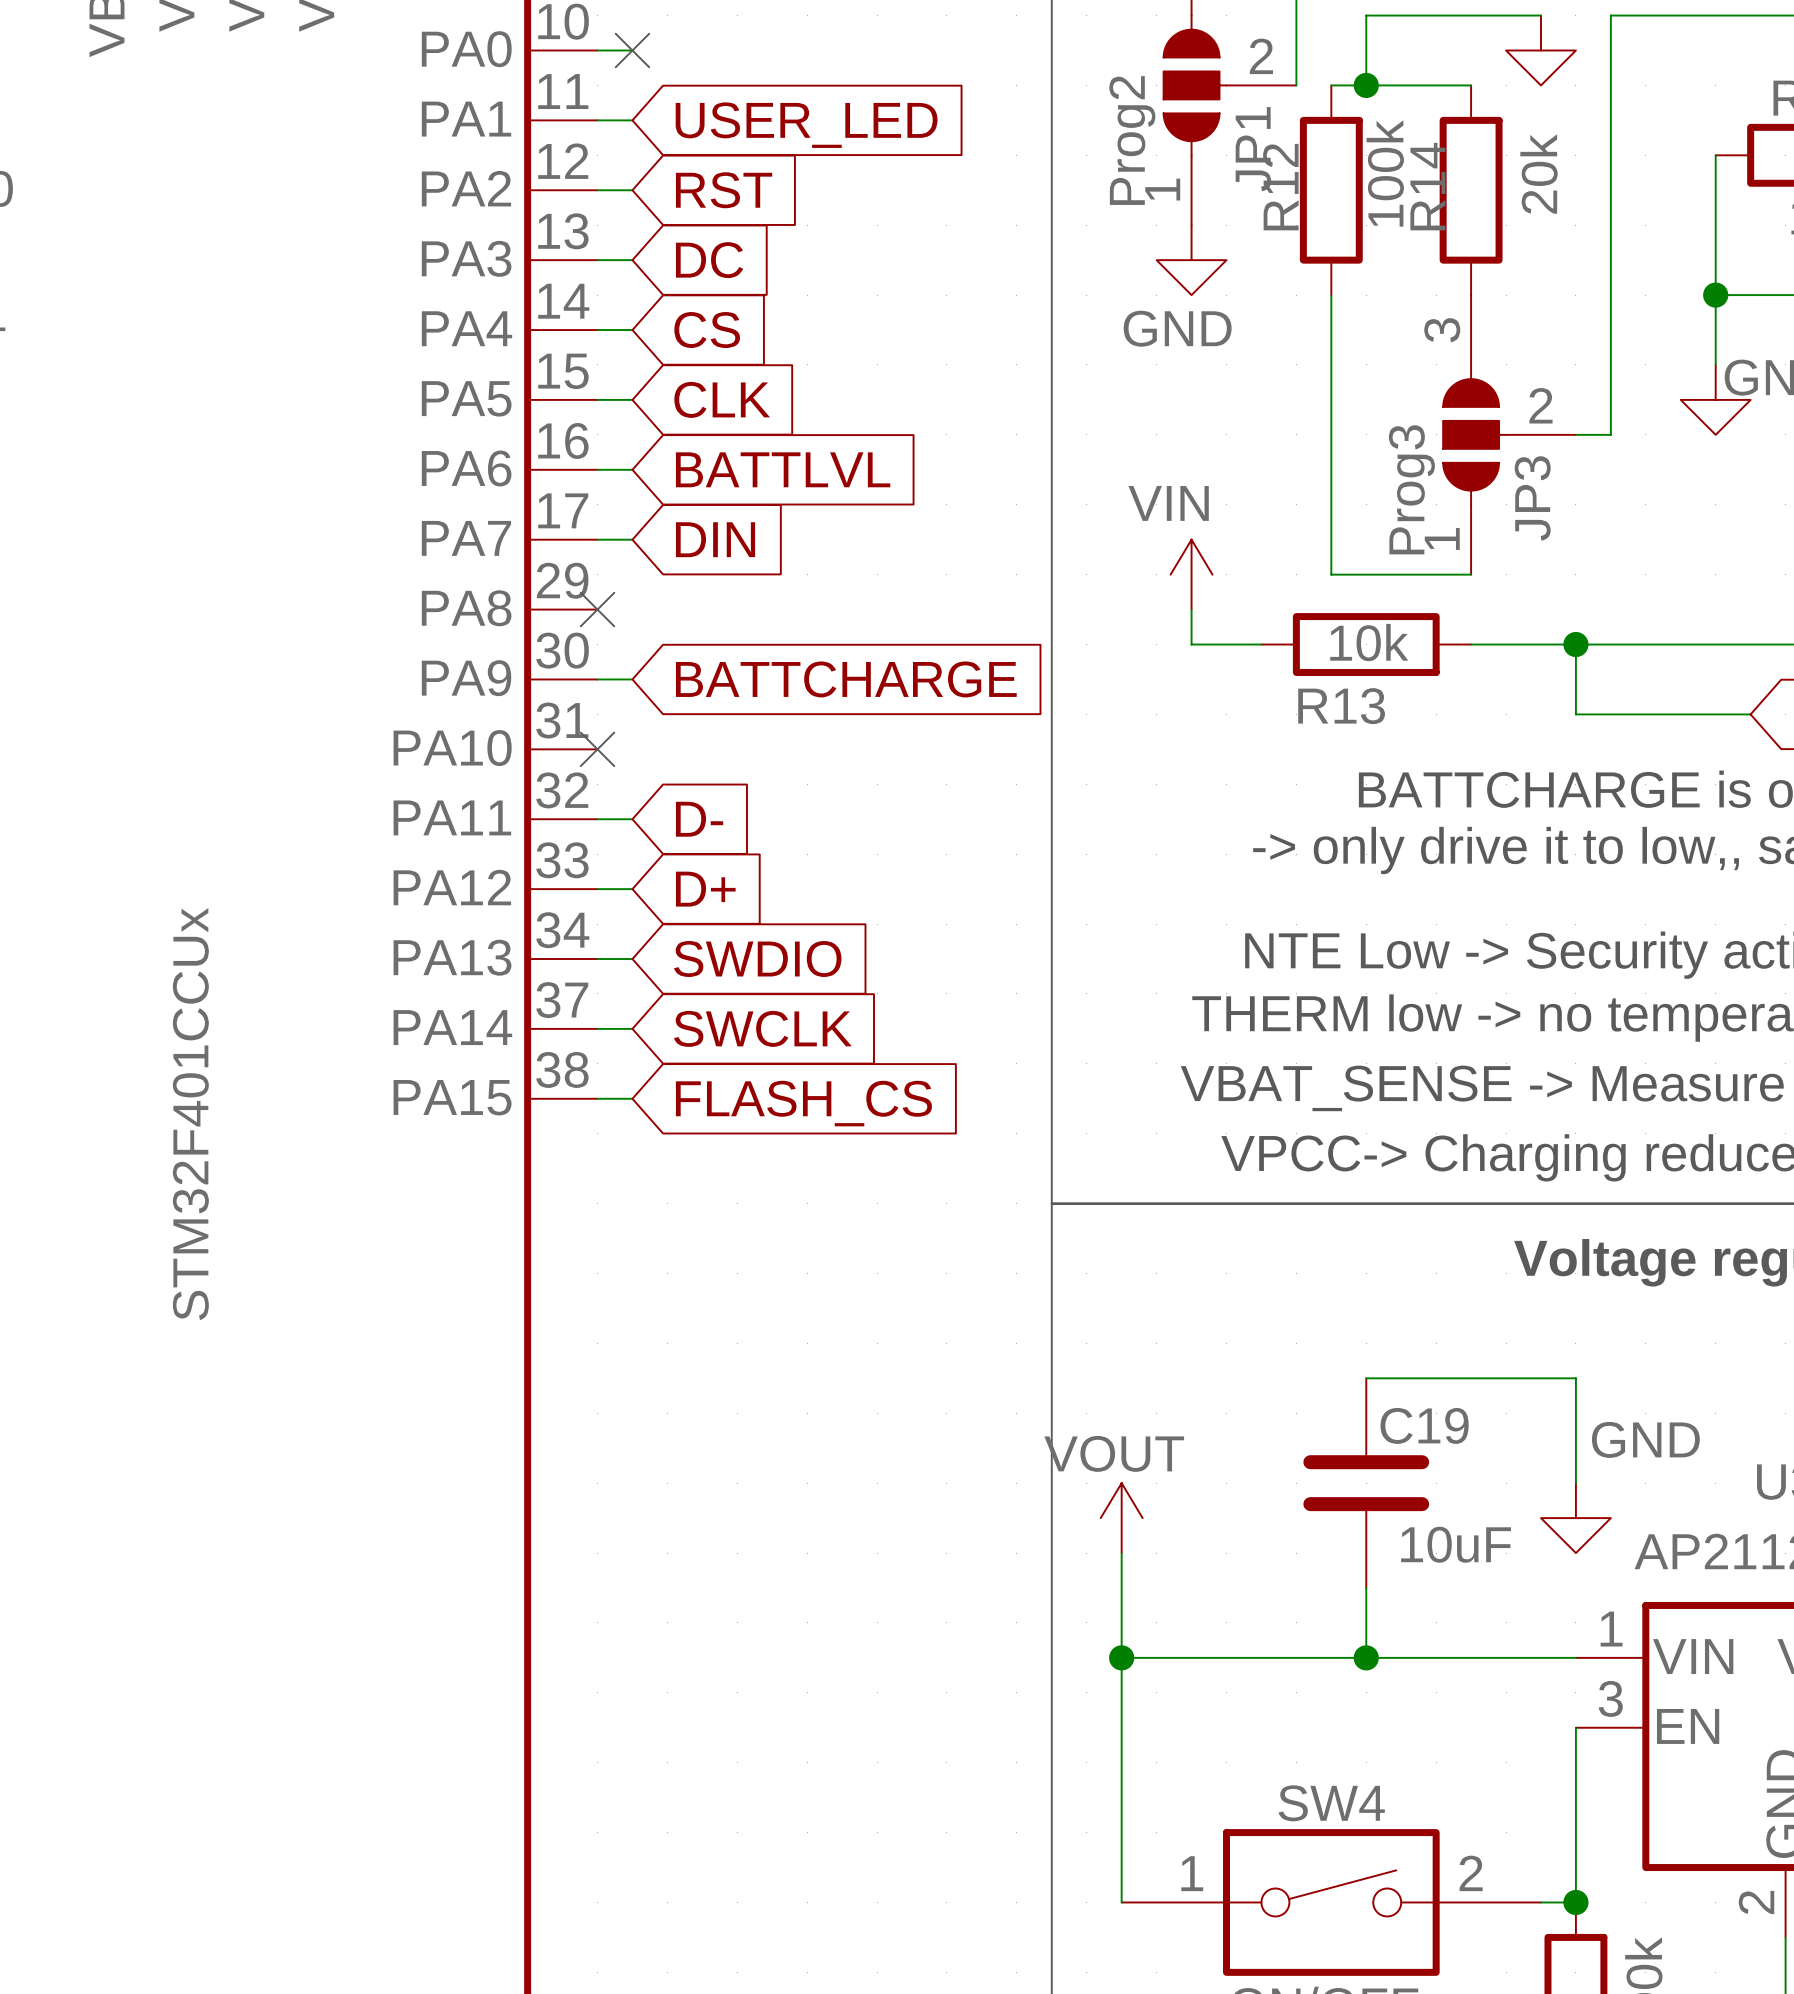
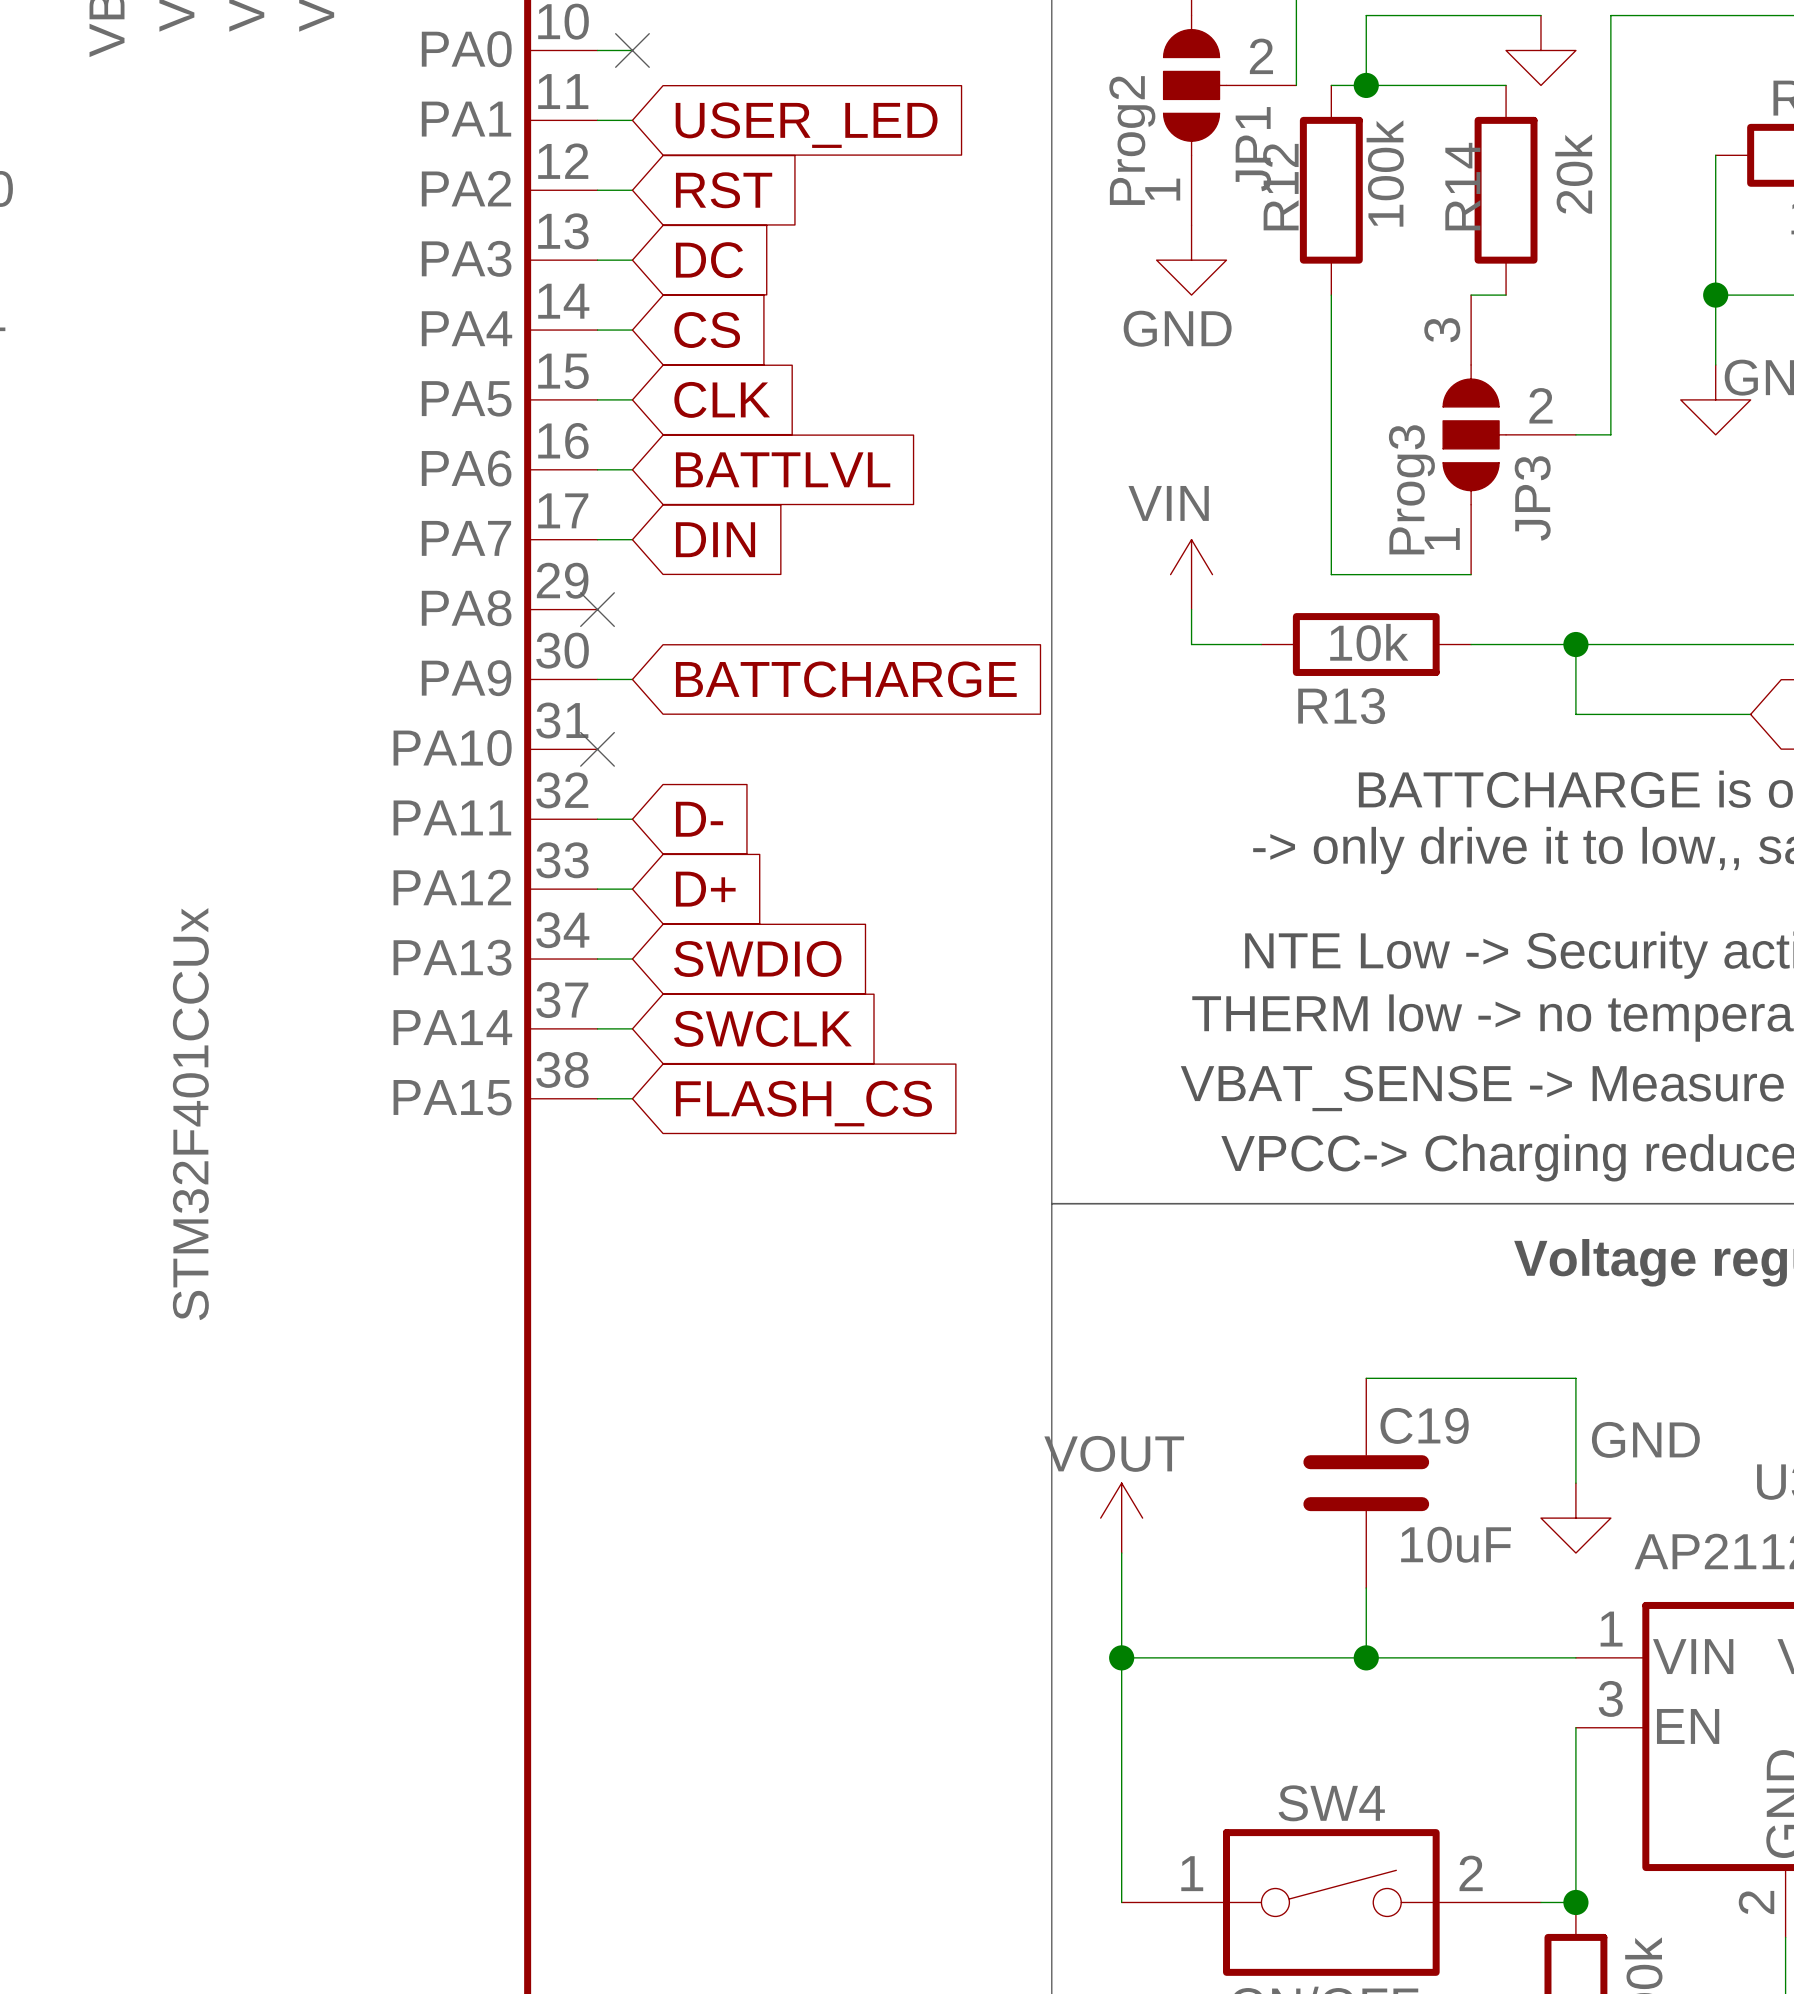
wire: none -> (1471, 85) (1506, 85)
R14 position: (1471, 190) -> (1506, 190)
wire: none -> (1471, 295) (1506, 295)

